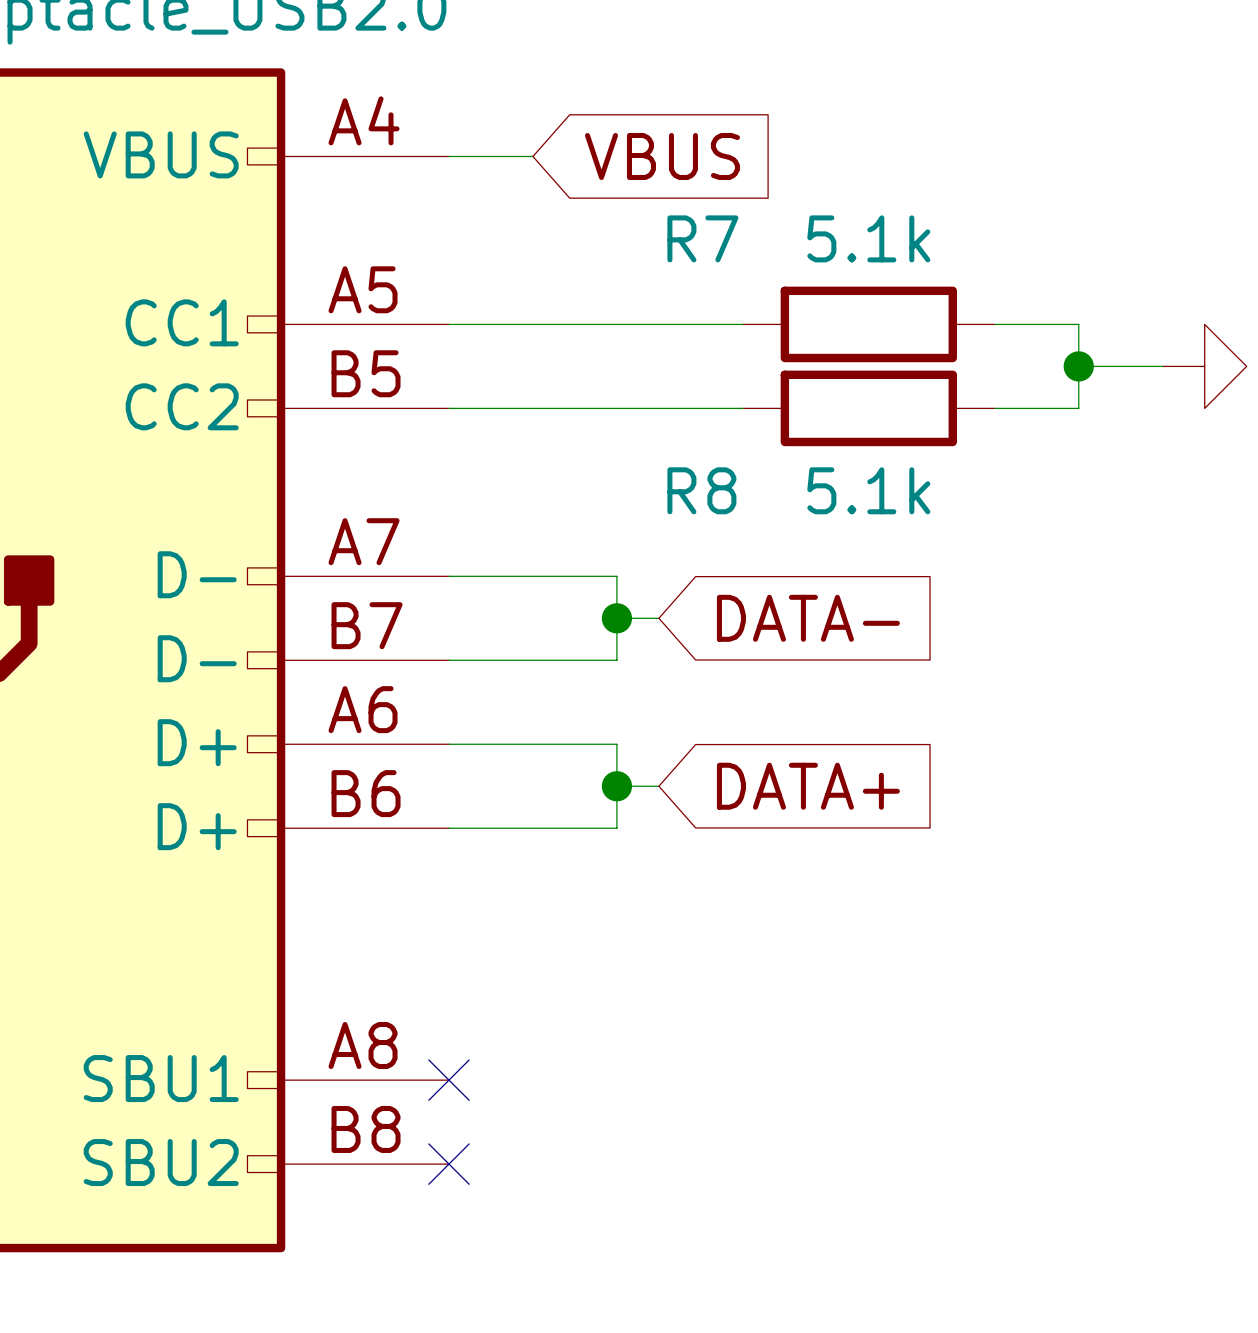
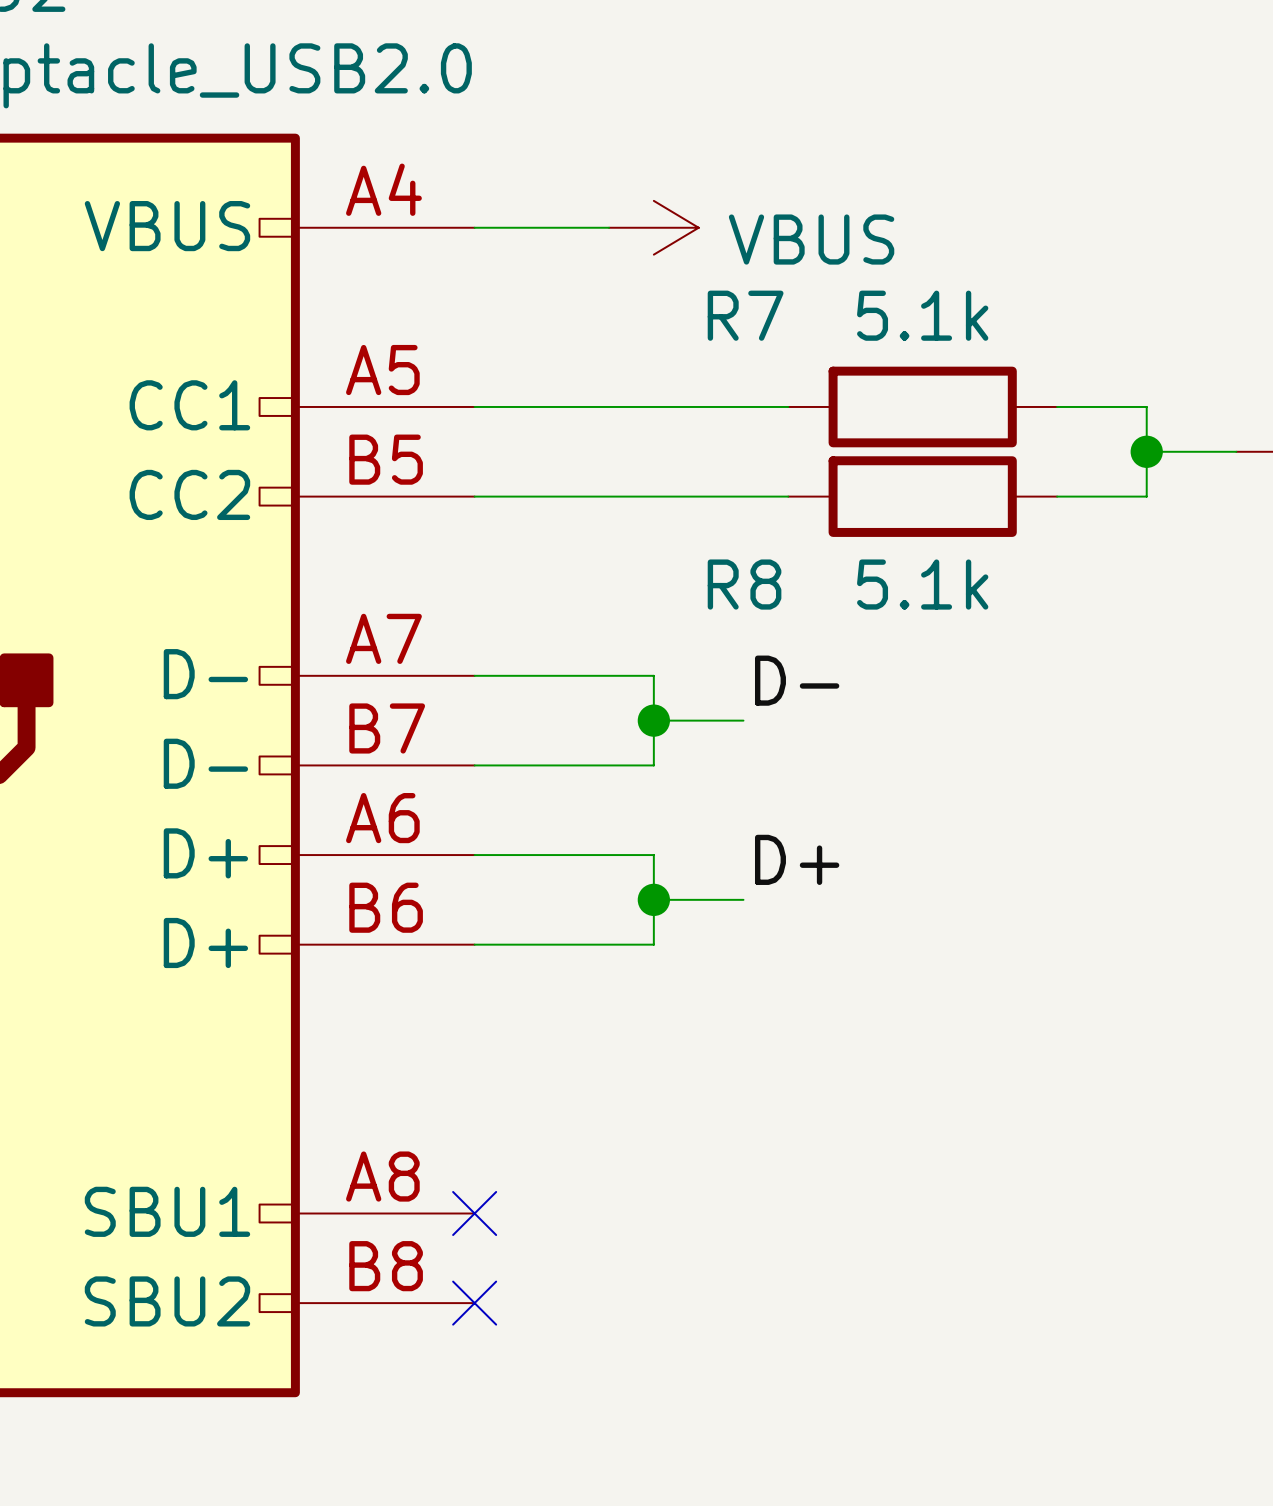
wire: none -> (564, 227) (609, 227)
power symbol: none -> VBUS (653, 227)
global label: VBUS (662, 156) -> none
label: none -> D- (797, 680)
wire: none -> (698, 720) (743, 720)
global label: DATA- (808, 618) -> none
label: none -> D+ (797, 859)
wire: none -> (698, 899) (743, 899)
global label: DATA+ (808, 786) -> none

